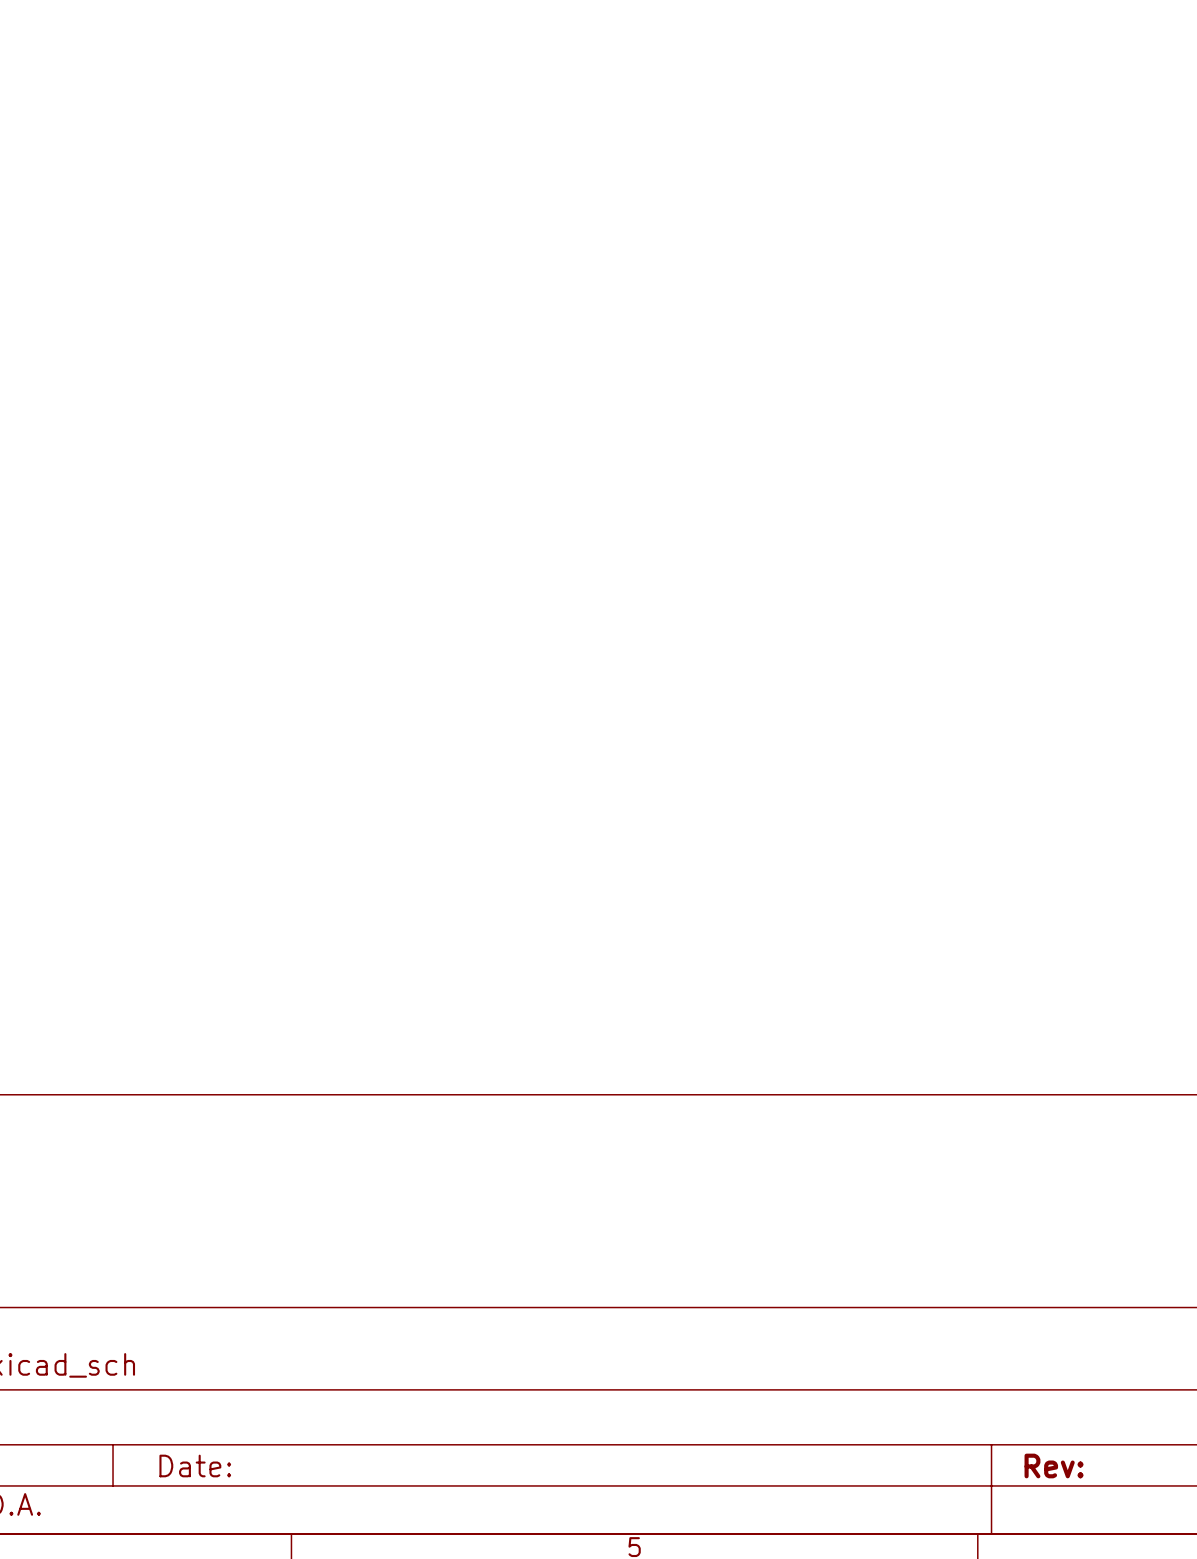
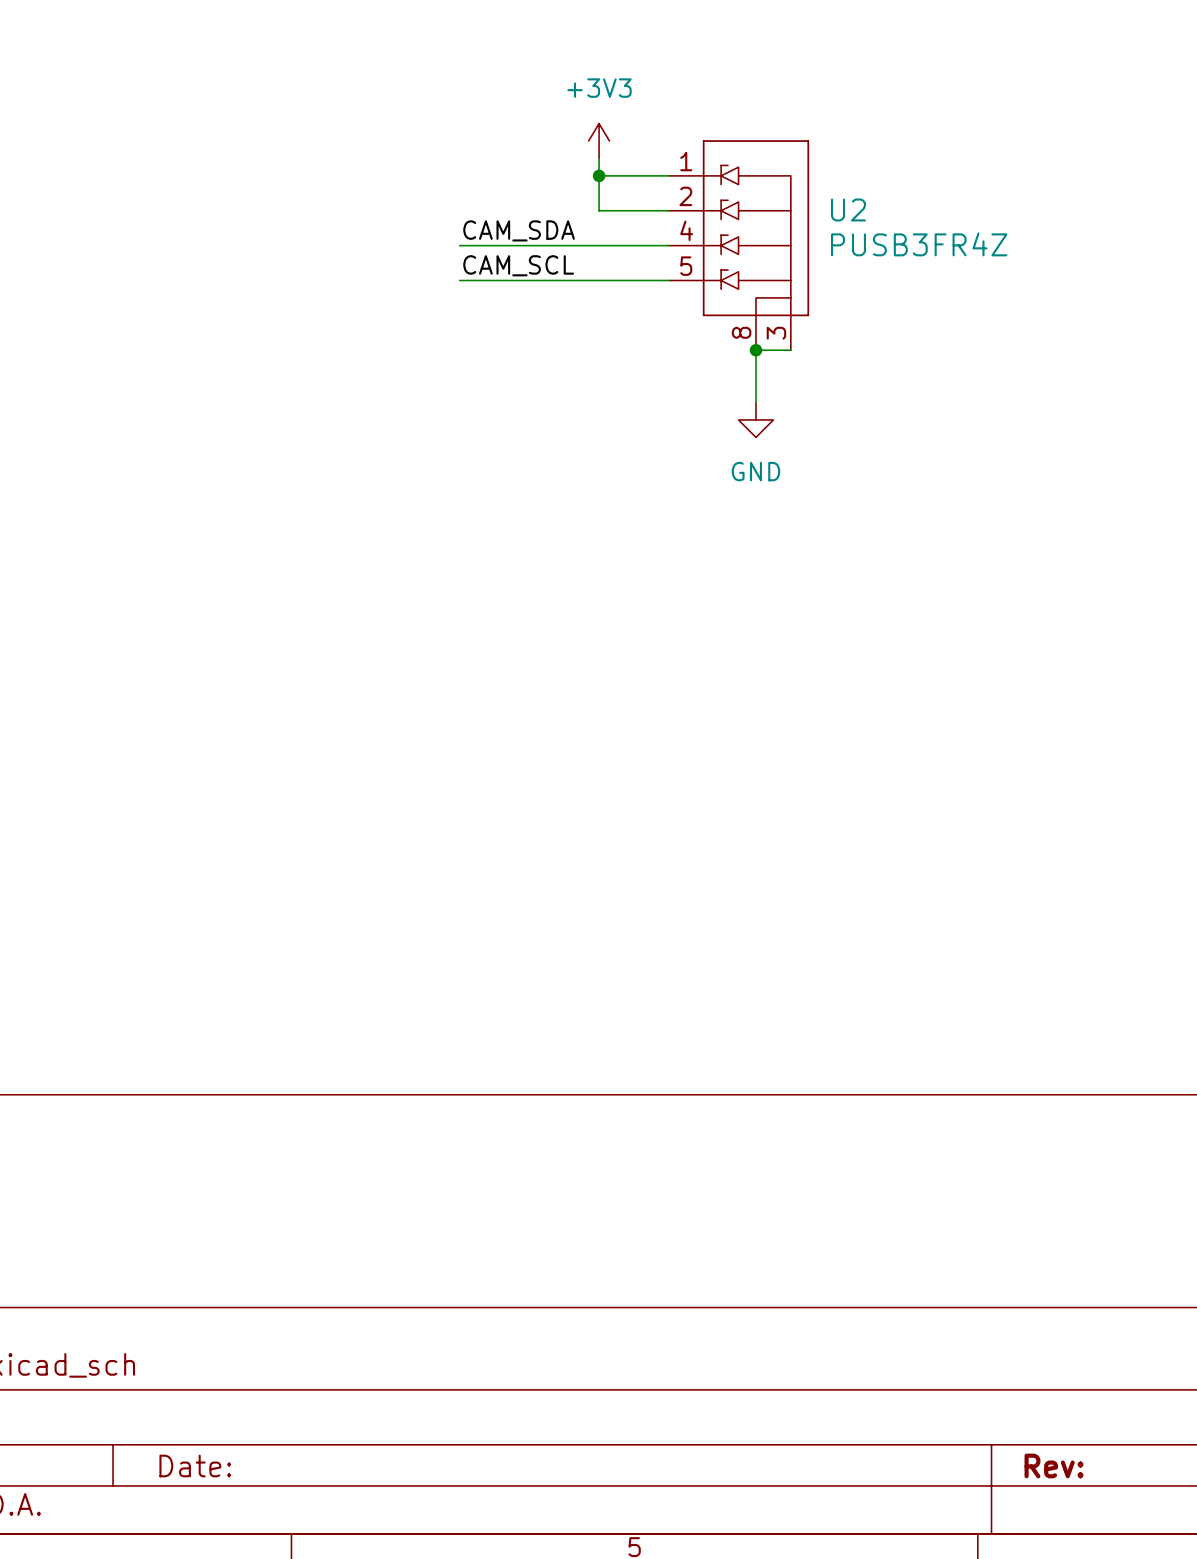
power symbol: none -> +3V3 (599, 141)
wire: none -> (599, 158) (599, 210) (668, 210)
wire: none -> (599, 175) (668, 175)
junction: none -> (599, 175)
label: none -> CAM_SDA (519, 230)
wire: none -> (459, 245) (668, 245)
U2: none -> PUSB3FR4Z (738, 245)
label: none -> CAM_SCL (518, 265)
wire: none -> (459, 280) (668, 280)
junction: none -> (755, 350)
wire: none -> (790, 350) (755, 350) (755, 402)
power symbol: none -> GND (755, 419)

